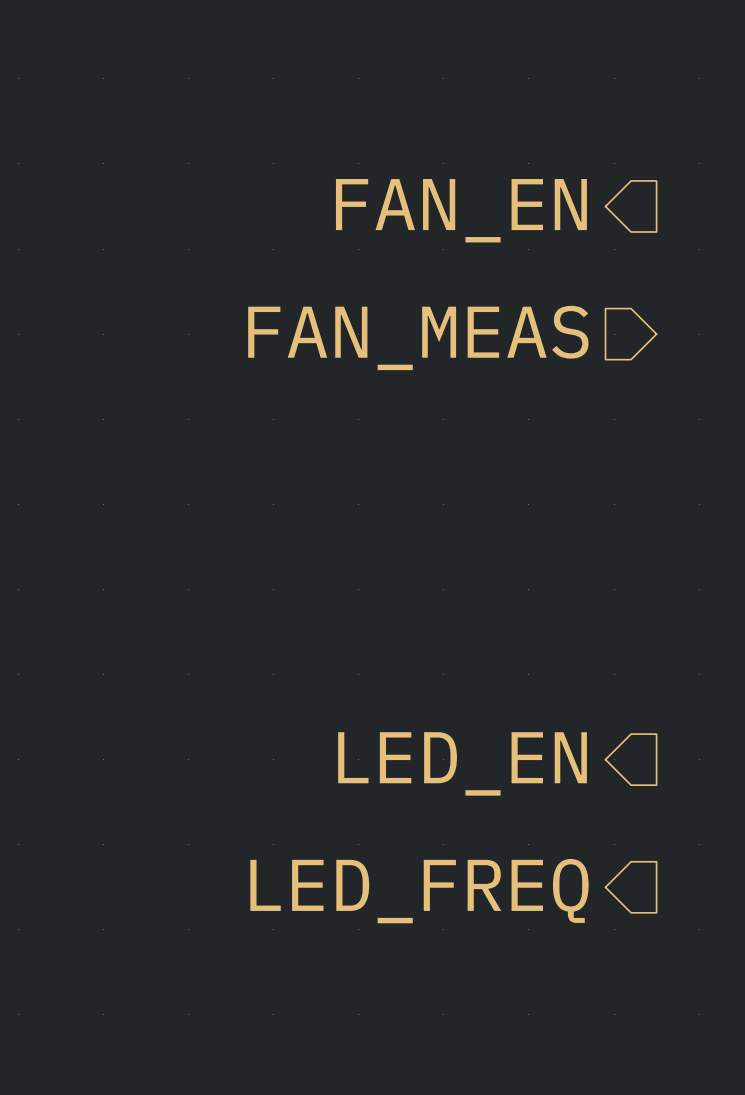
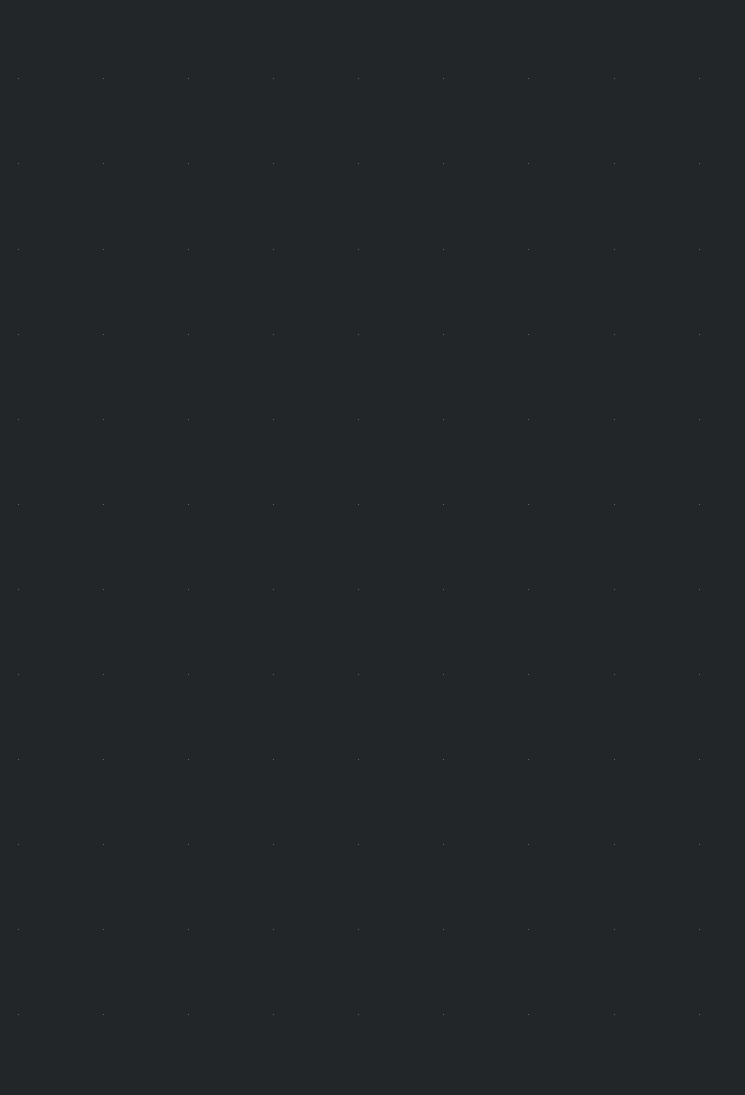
hierarchical label: FAN_EN (461, 210) -> none
hierarchical label: FAN_MEAS (418, 337) -> none
hierarchical label: LED_EN (462, 763) -> none
hierarchical label: LED_FREQ (419, 891) -> none

